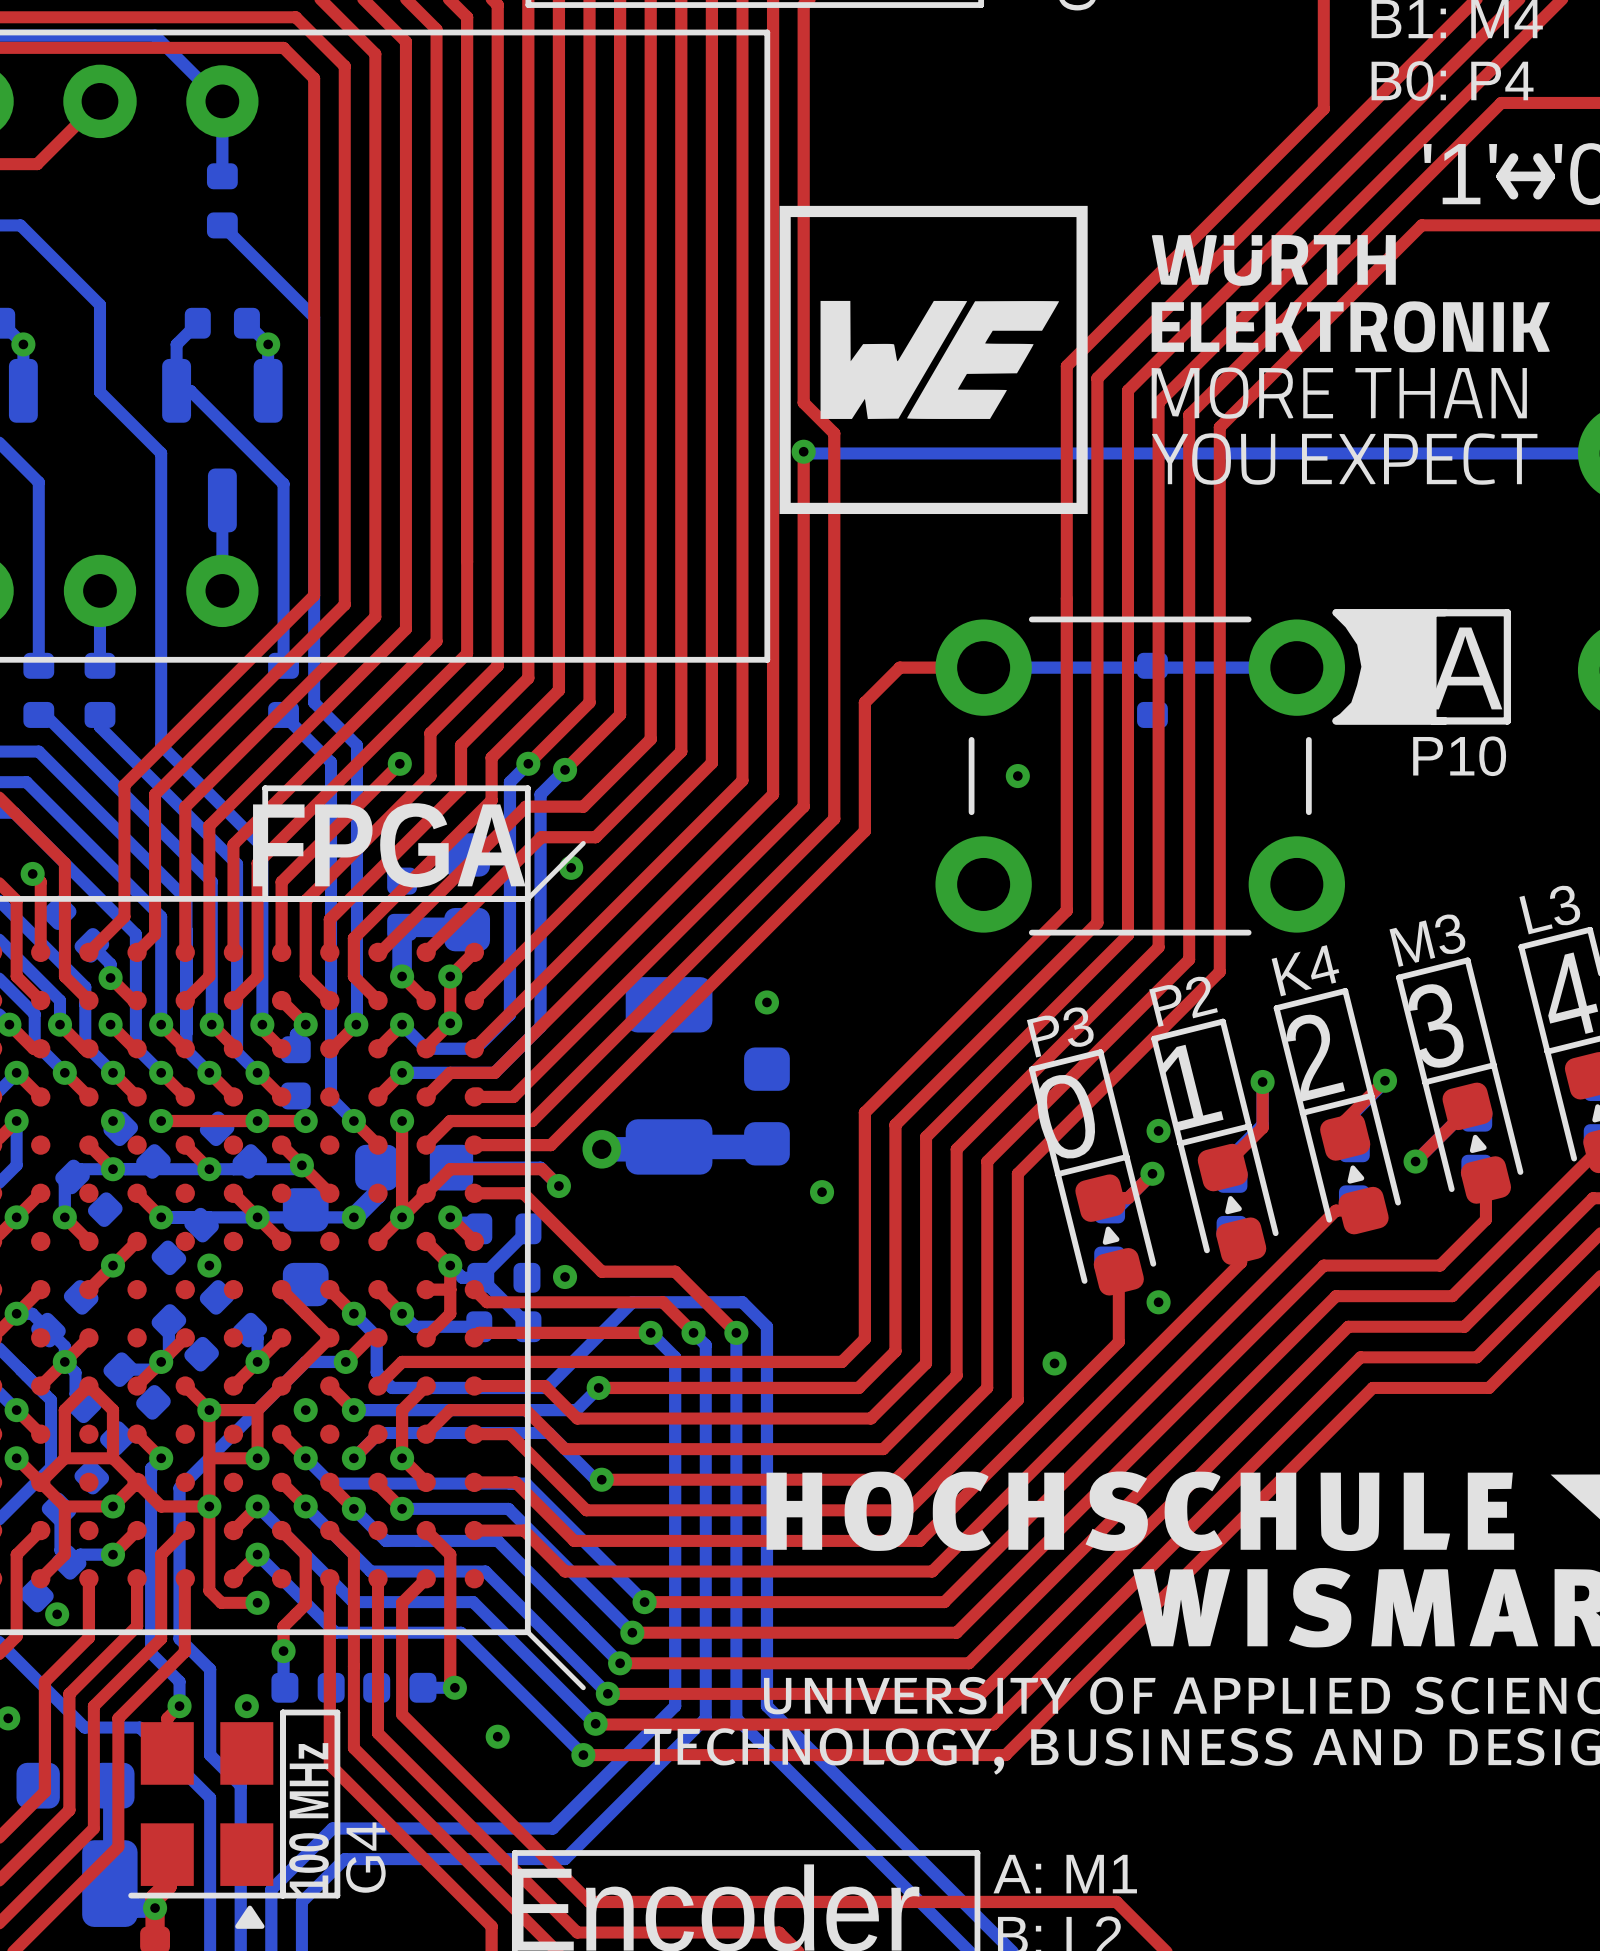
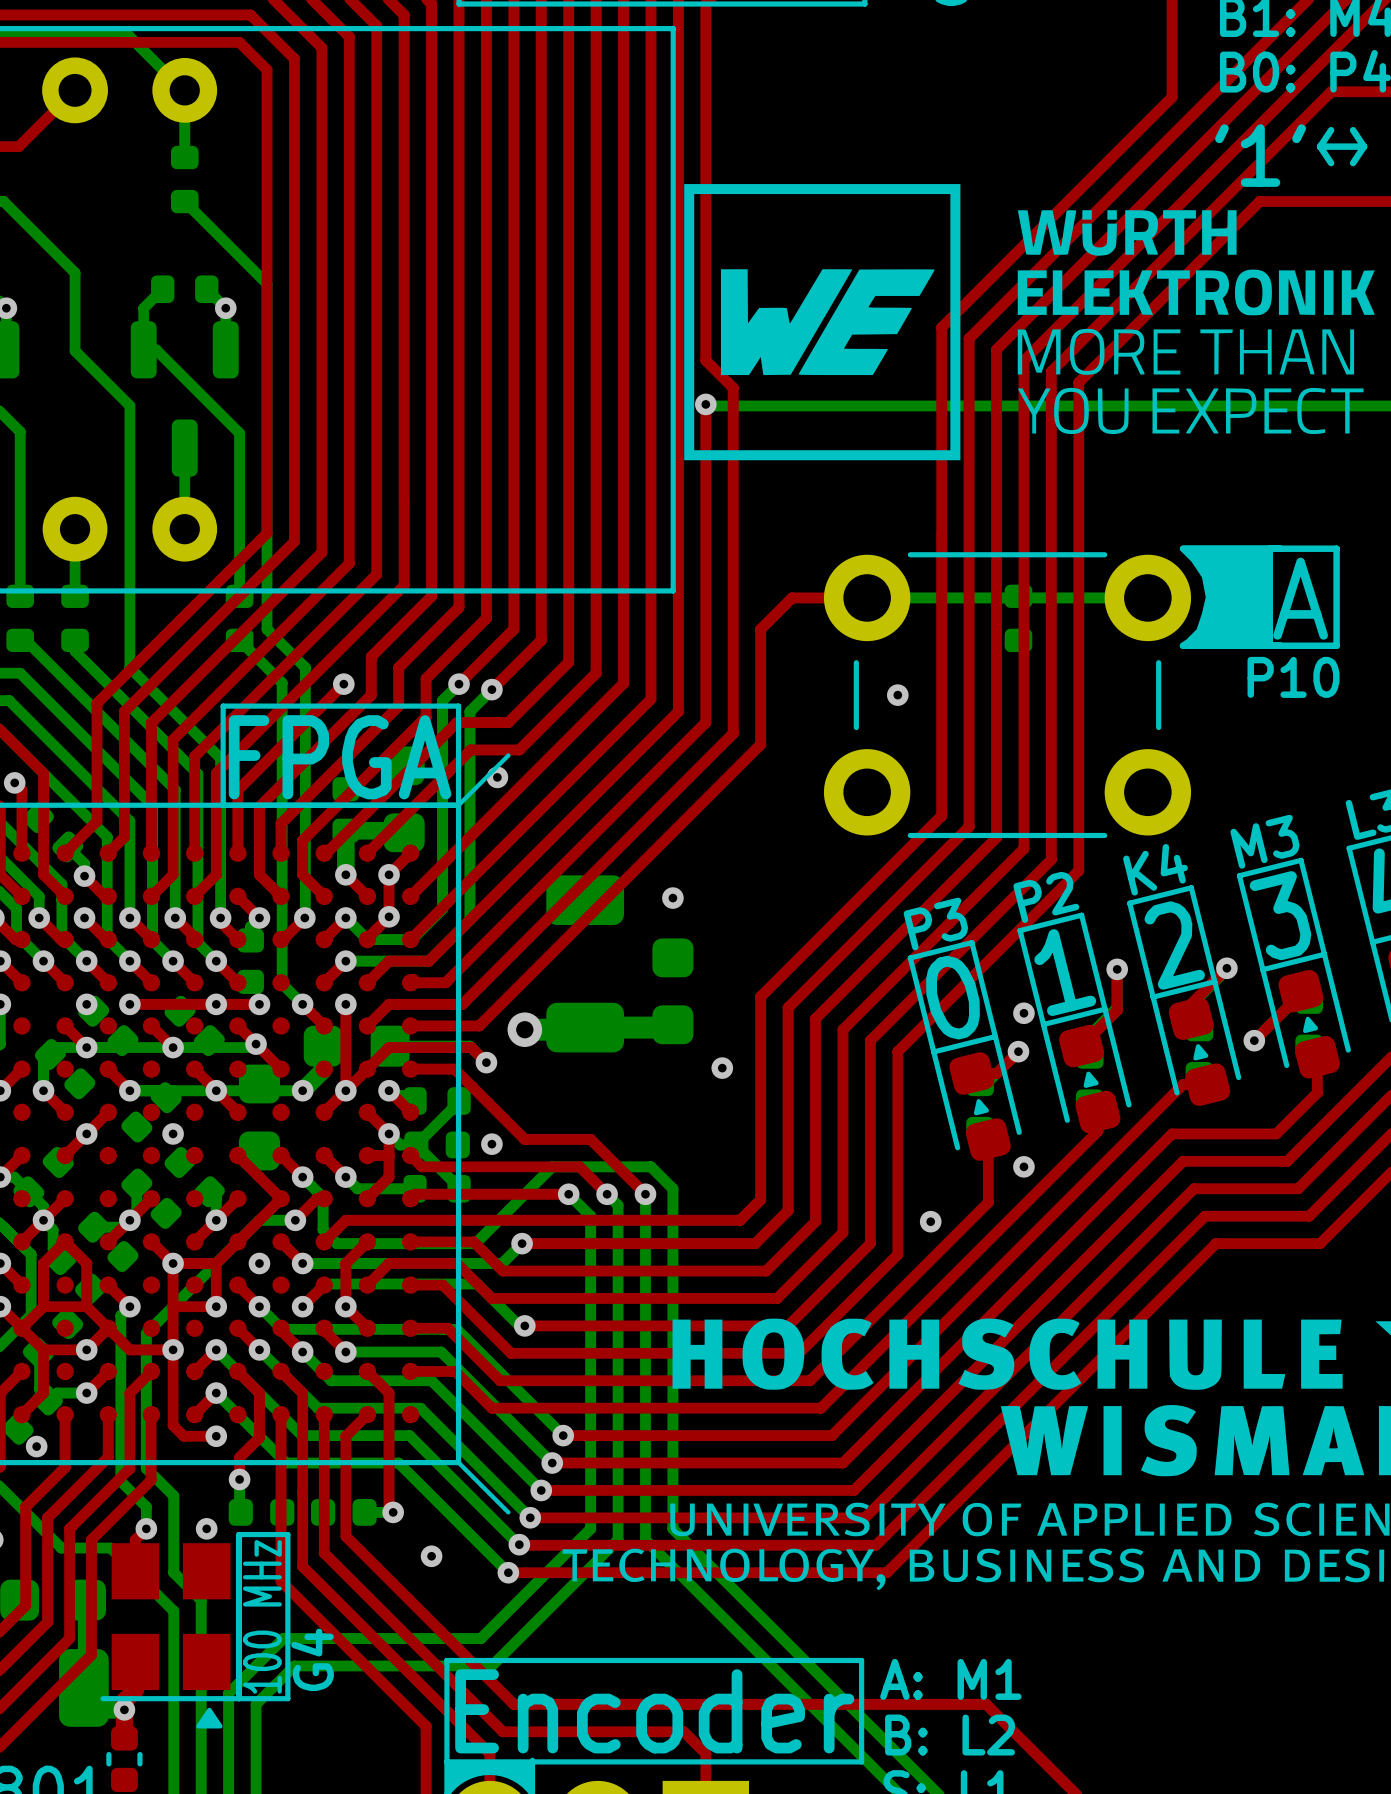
line: (1513, 158) (1501, 176) -> (1331, 130) (1320, 146)
line: (1537, 158) (1550, 176) -> (1353, 130) (1364, 146)
line: (1501, 176) (1513, 194) -> (1320, 146) (1331, 163)
line: (1501, 176) (1550, 176) -> (1320, 146) (1364, 146)
line: (1550, 176) (1537, 194) -> (1364, 146) (1353, 163)

